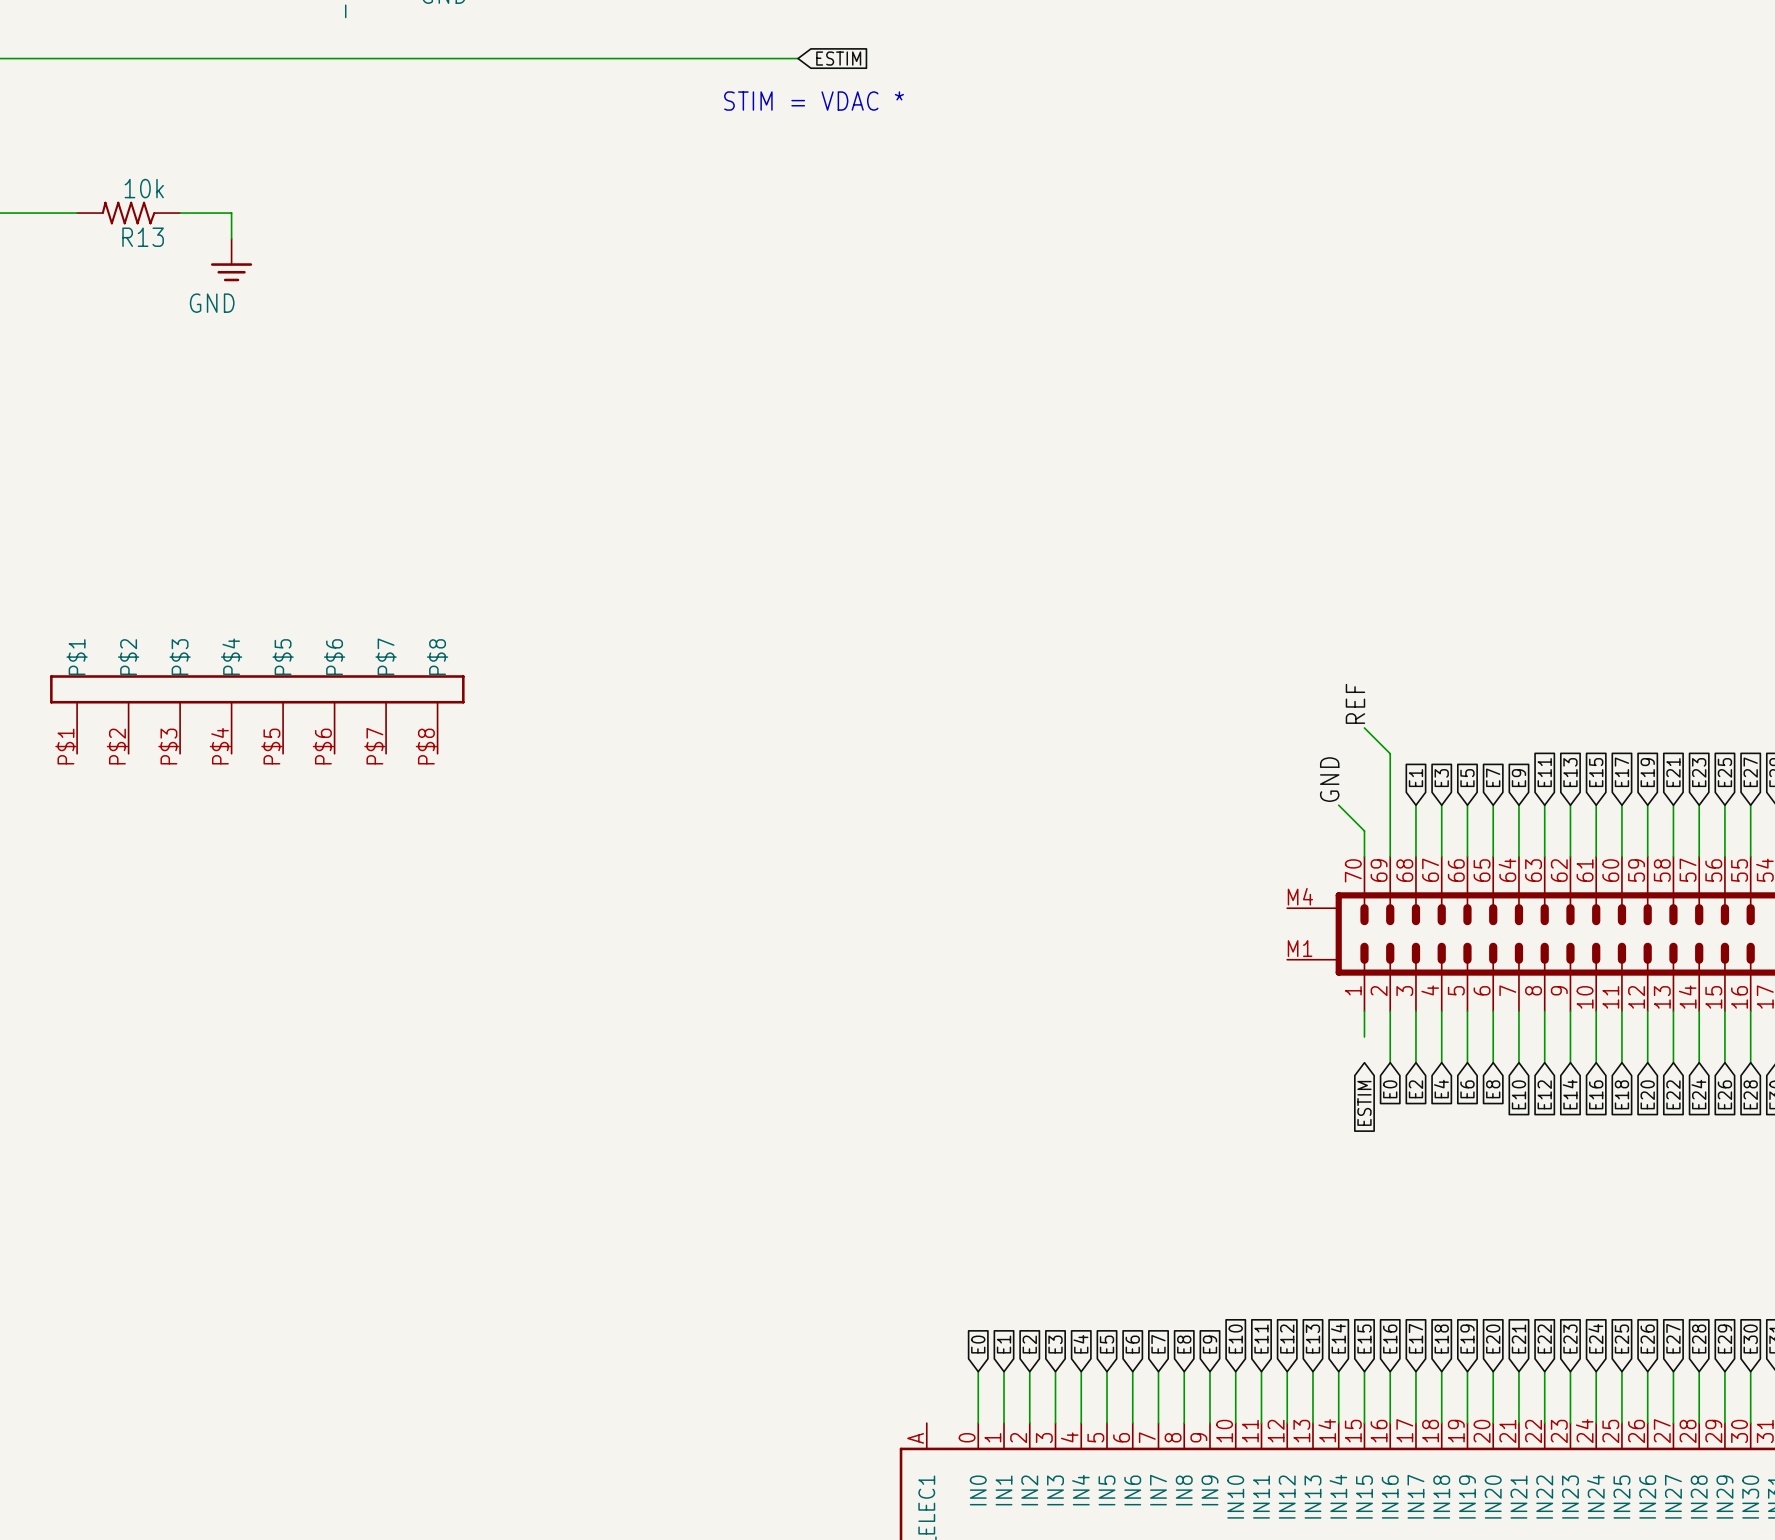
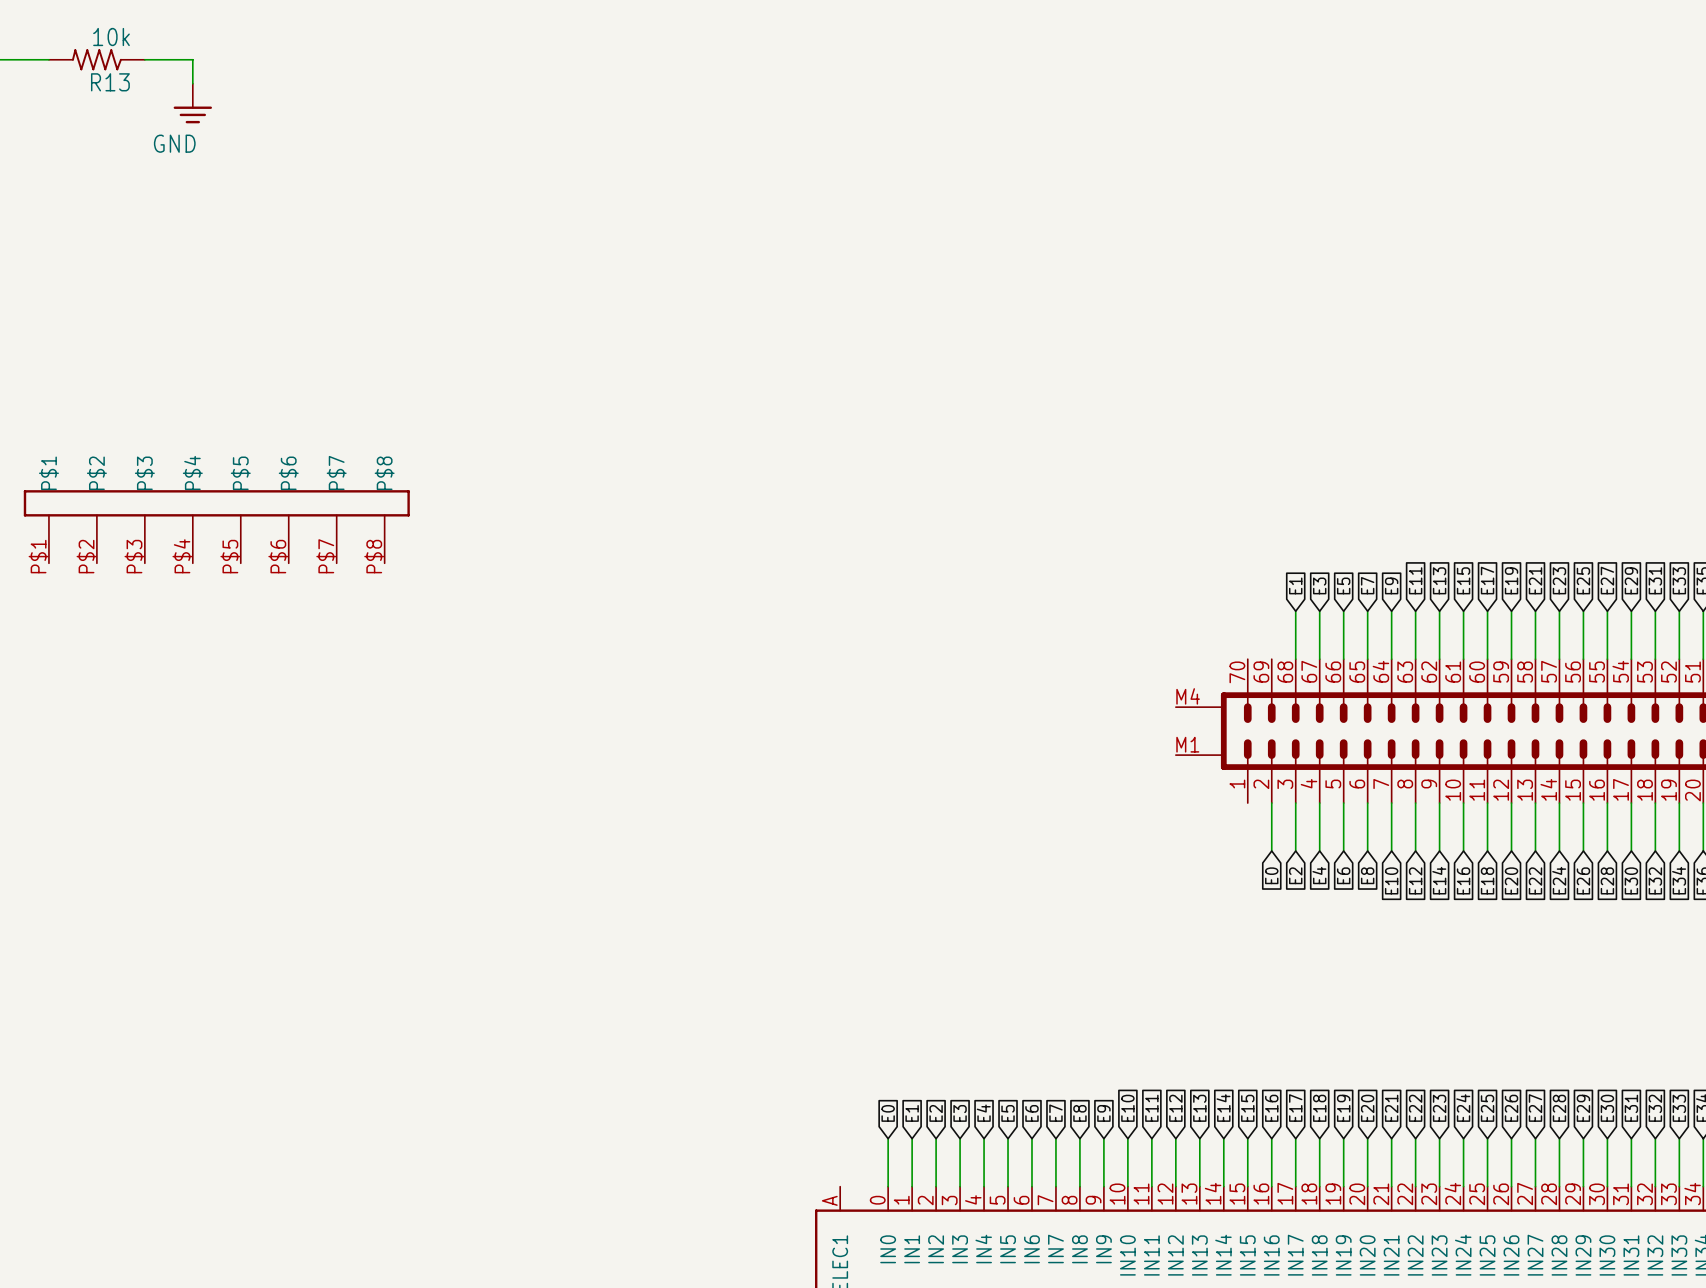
label: REF (1355, 703) -> none
wire: (1364, 727) (1390, 753) (1390, 856) -> none
label: GND (1329, 779) -> none
wire: (1338, 805) (1364, 830) (1364, 856) -> none
wire: (1364, 1011) (1364, 1036) -> none
global label: ESTIM (1364, 1103) -> none

